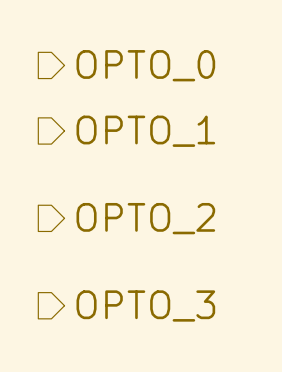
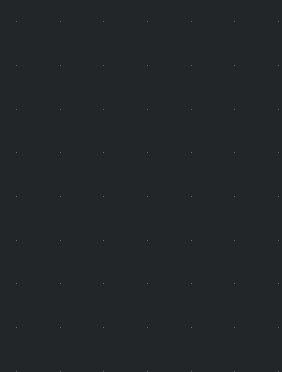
hierarchical label: OPTO_0 (145, 65) -> none
hierarchical label: OPTO_1 (145, 131) -> none
hierarchical label: OPTO_2 (145, 218) -> none
hierarchical label: OPTO_3 (145, 306) -> none

